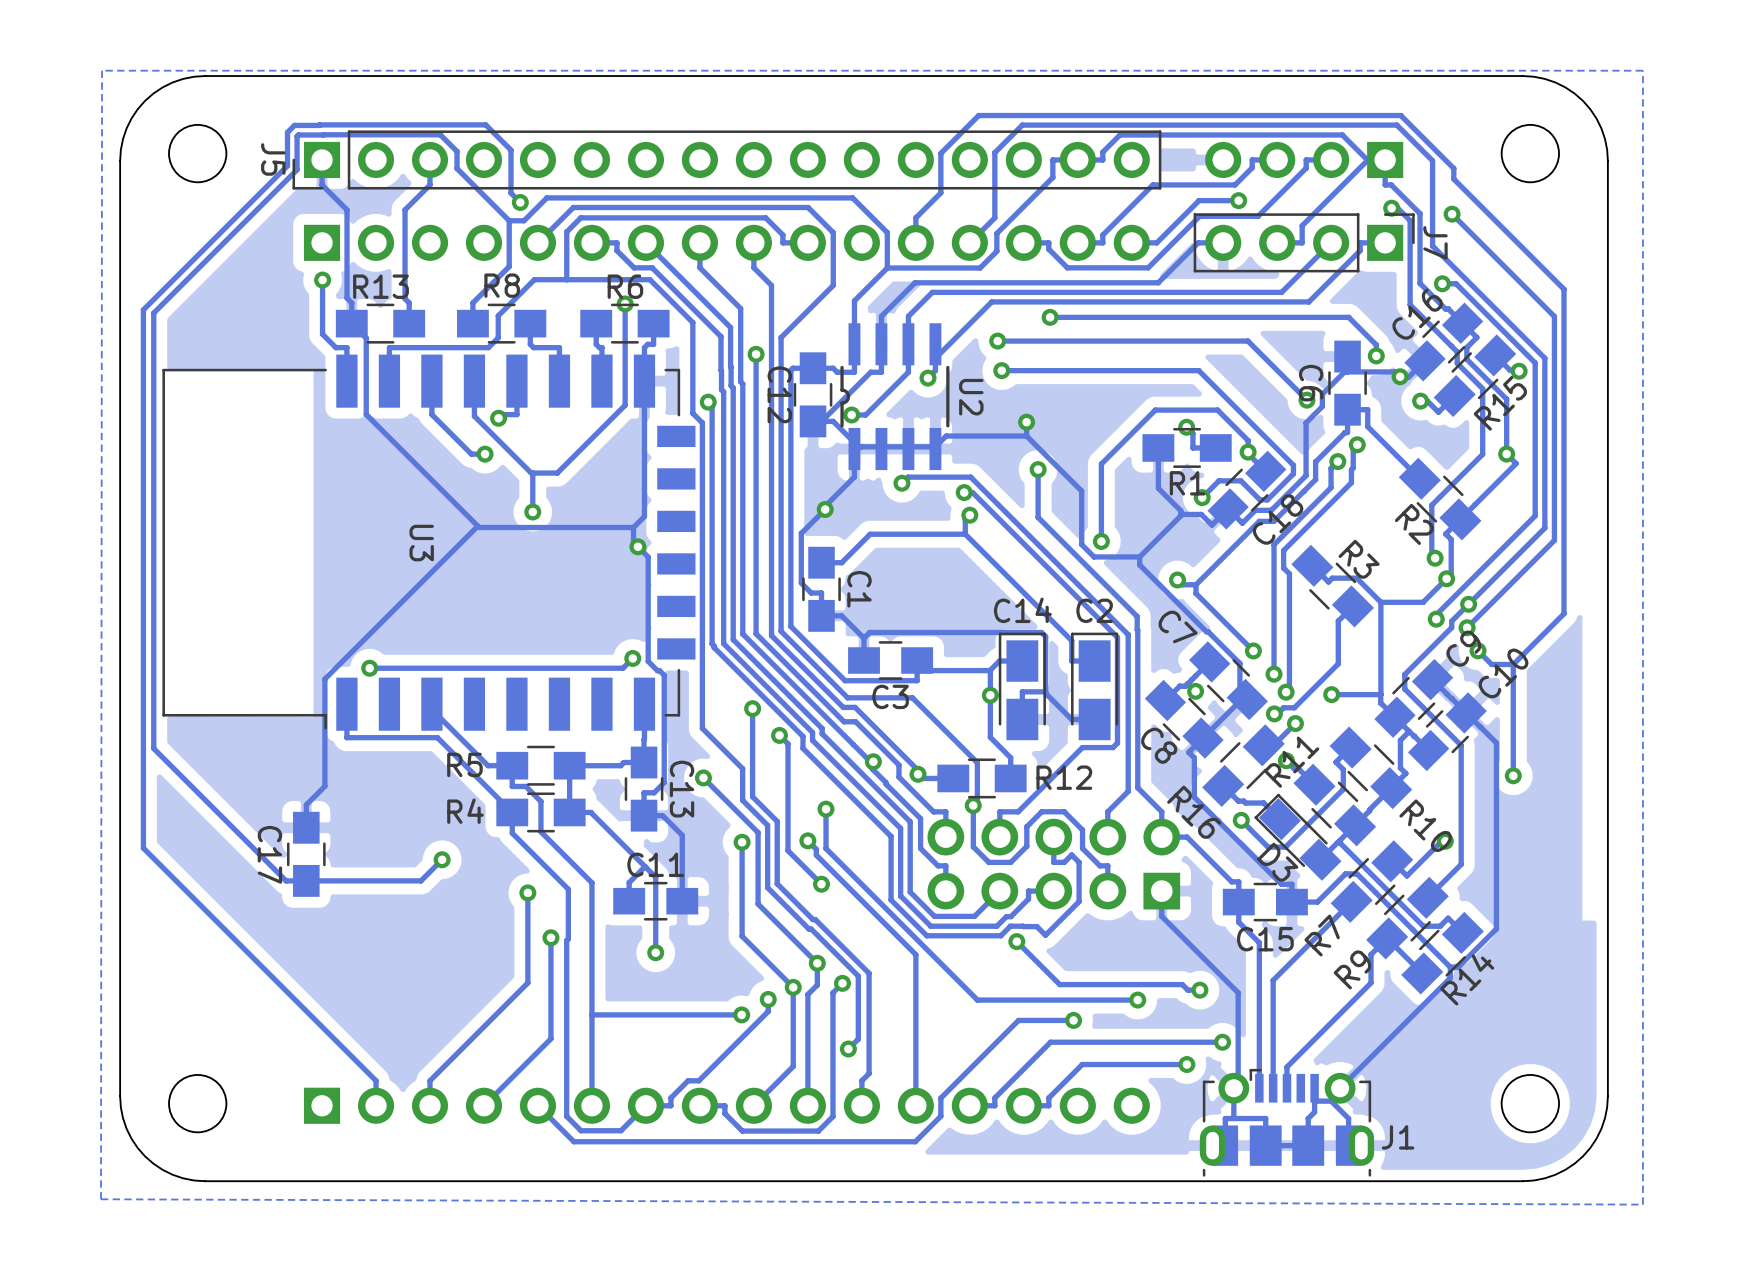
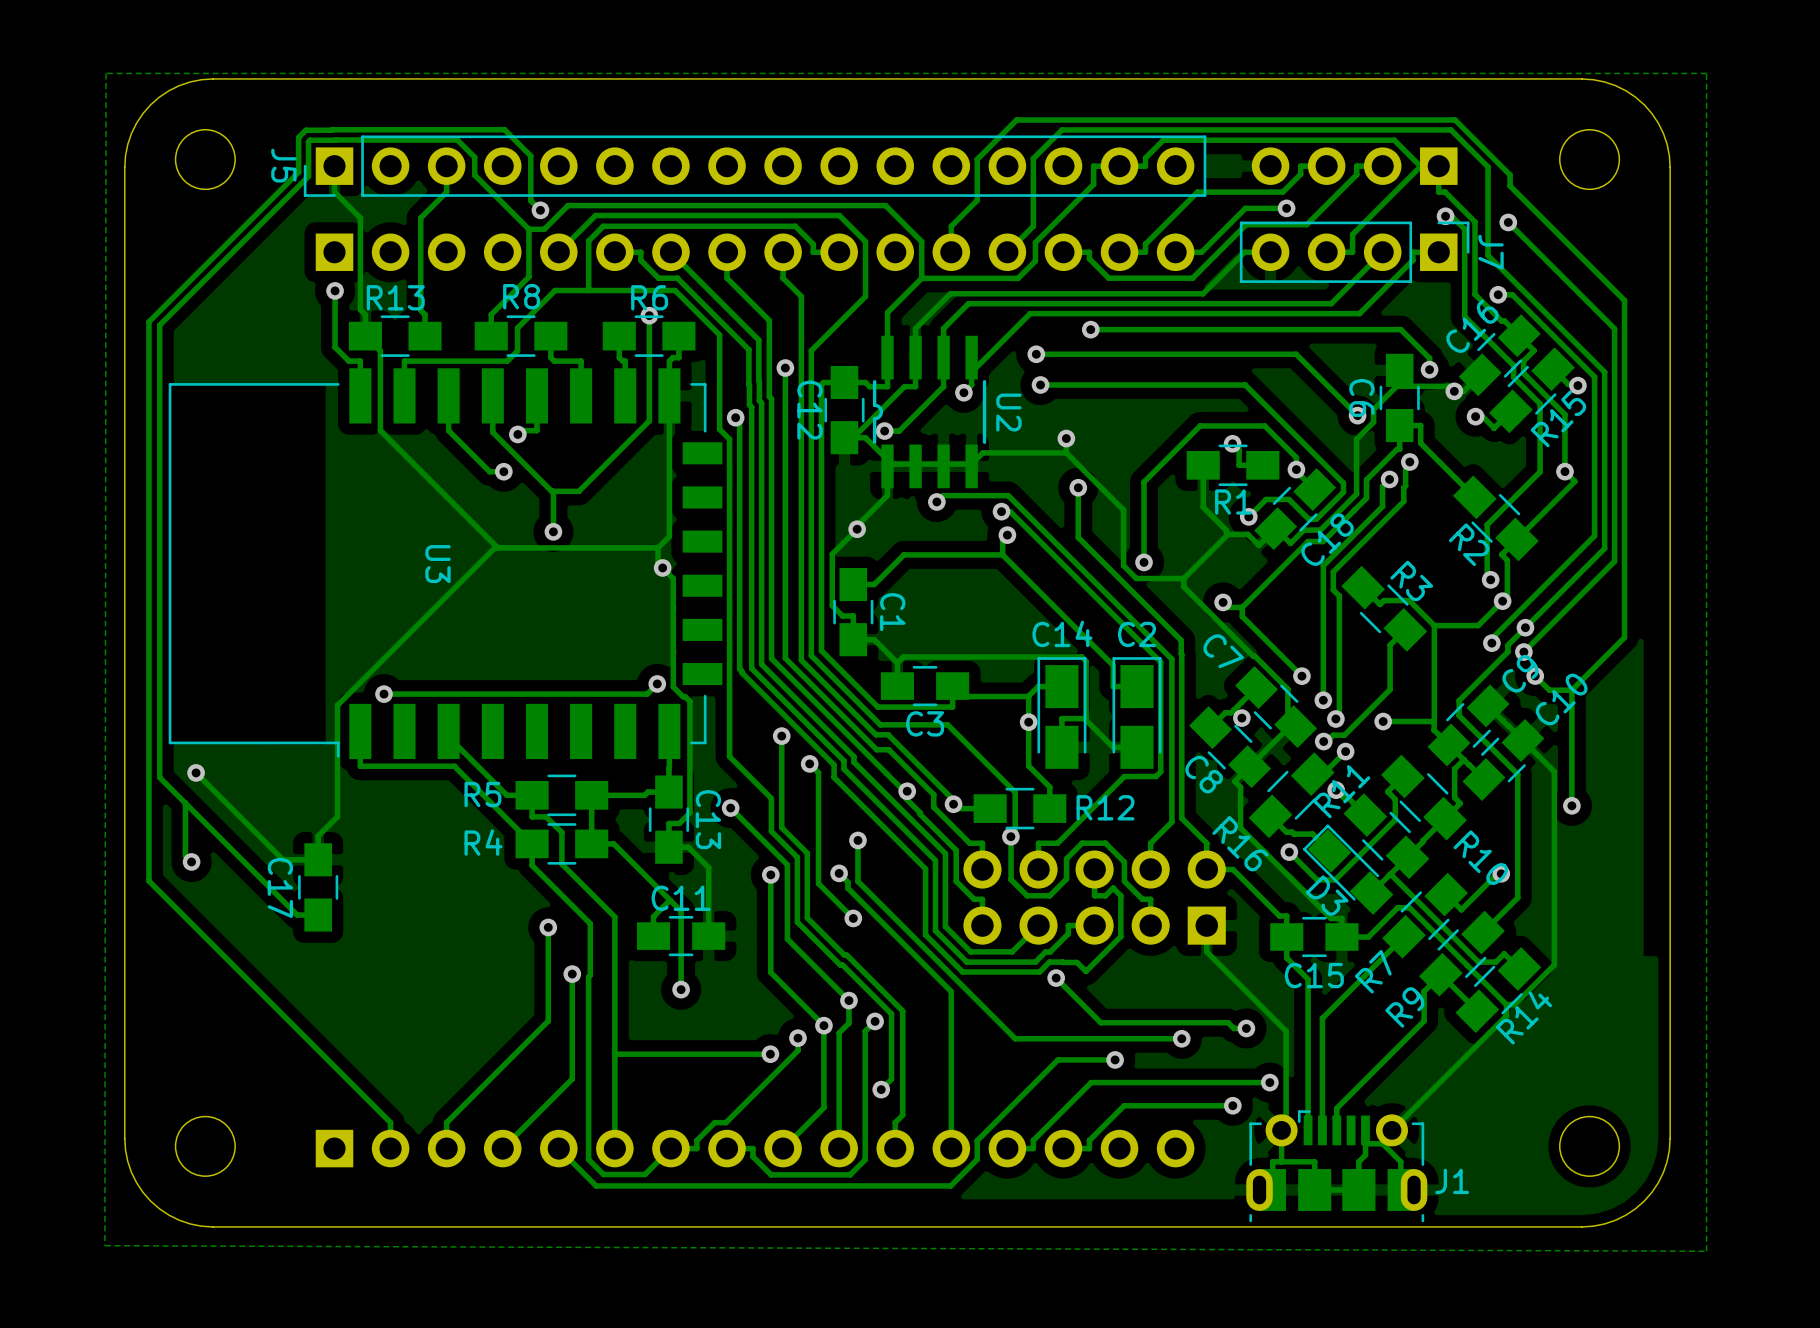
track: none -> (196, 772) (282, 859) (318, 859)
via: none -> (196, 772)
track: none -> (185, 803) (185, 855) (191, 861)
via: none -> (191, 861)
track: (442, 859) (420, 880) (306, 880) -> none
via: (442, 859) -> none

